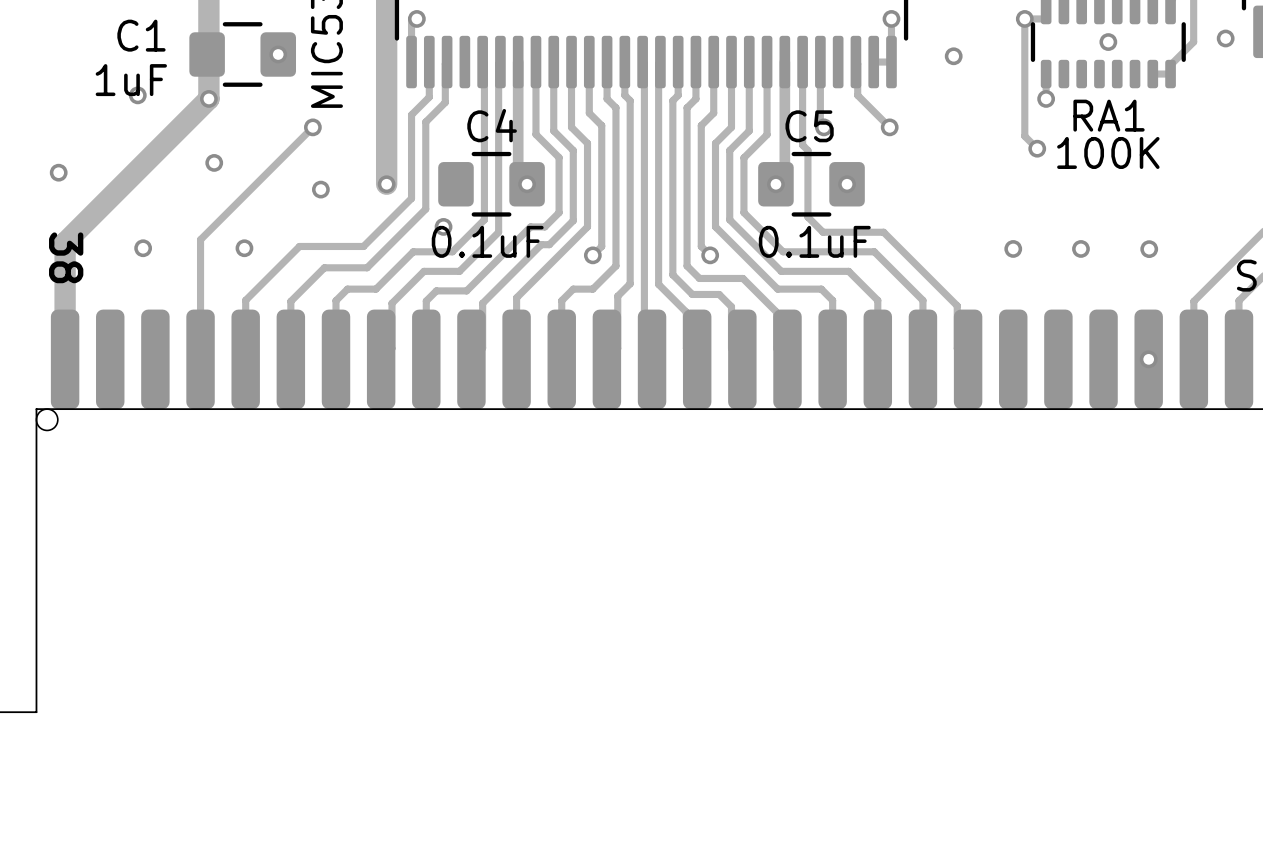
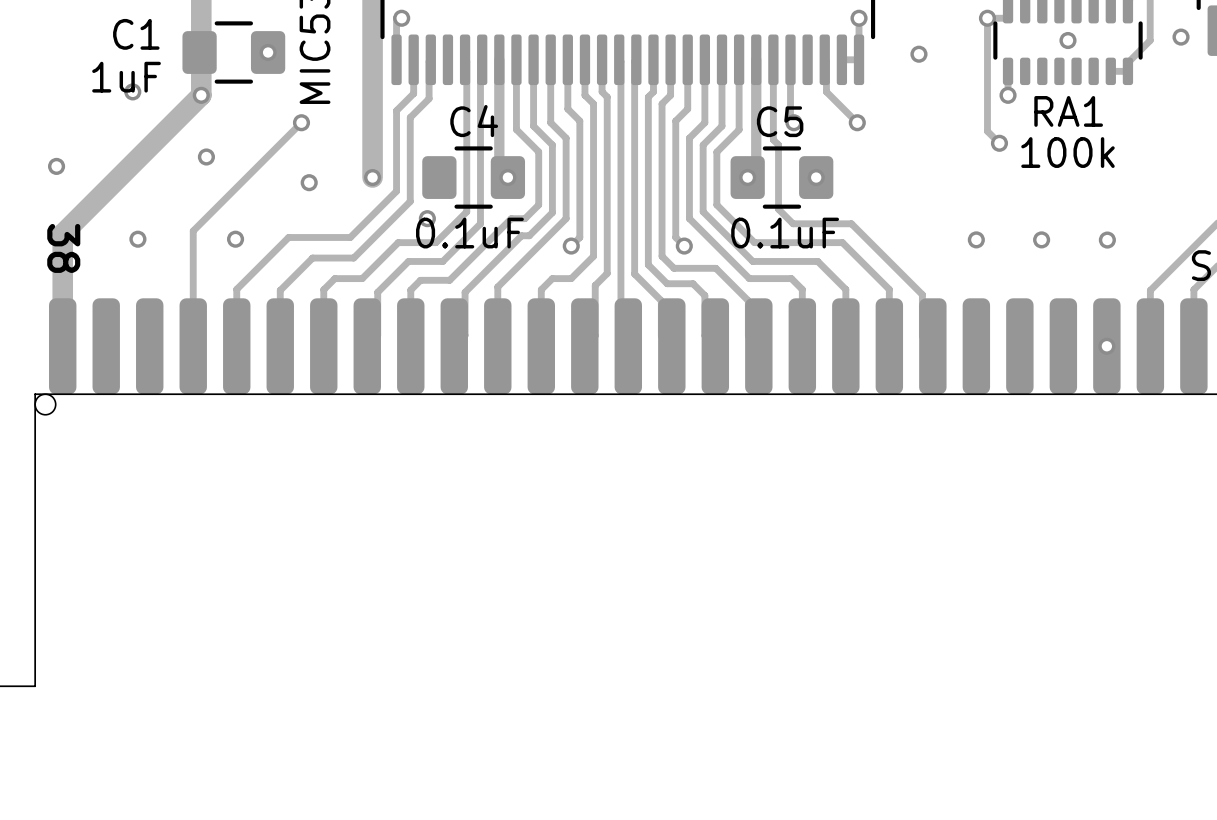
RA1 value: 100K (1108, 152) -> 100k (1067, 152)

